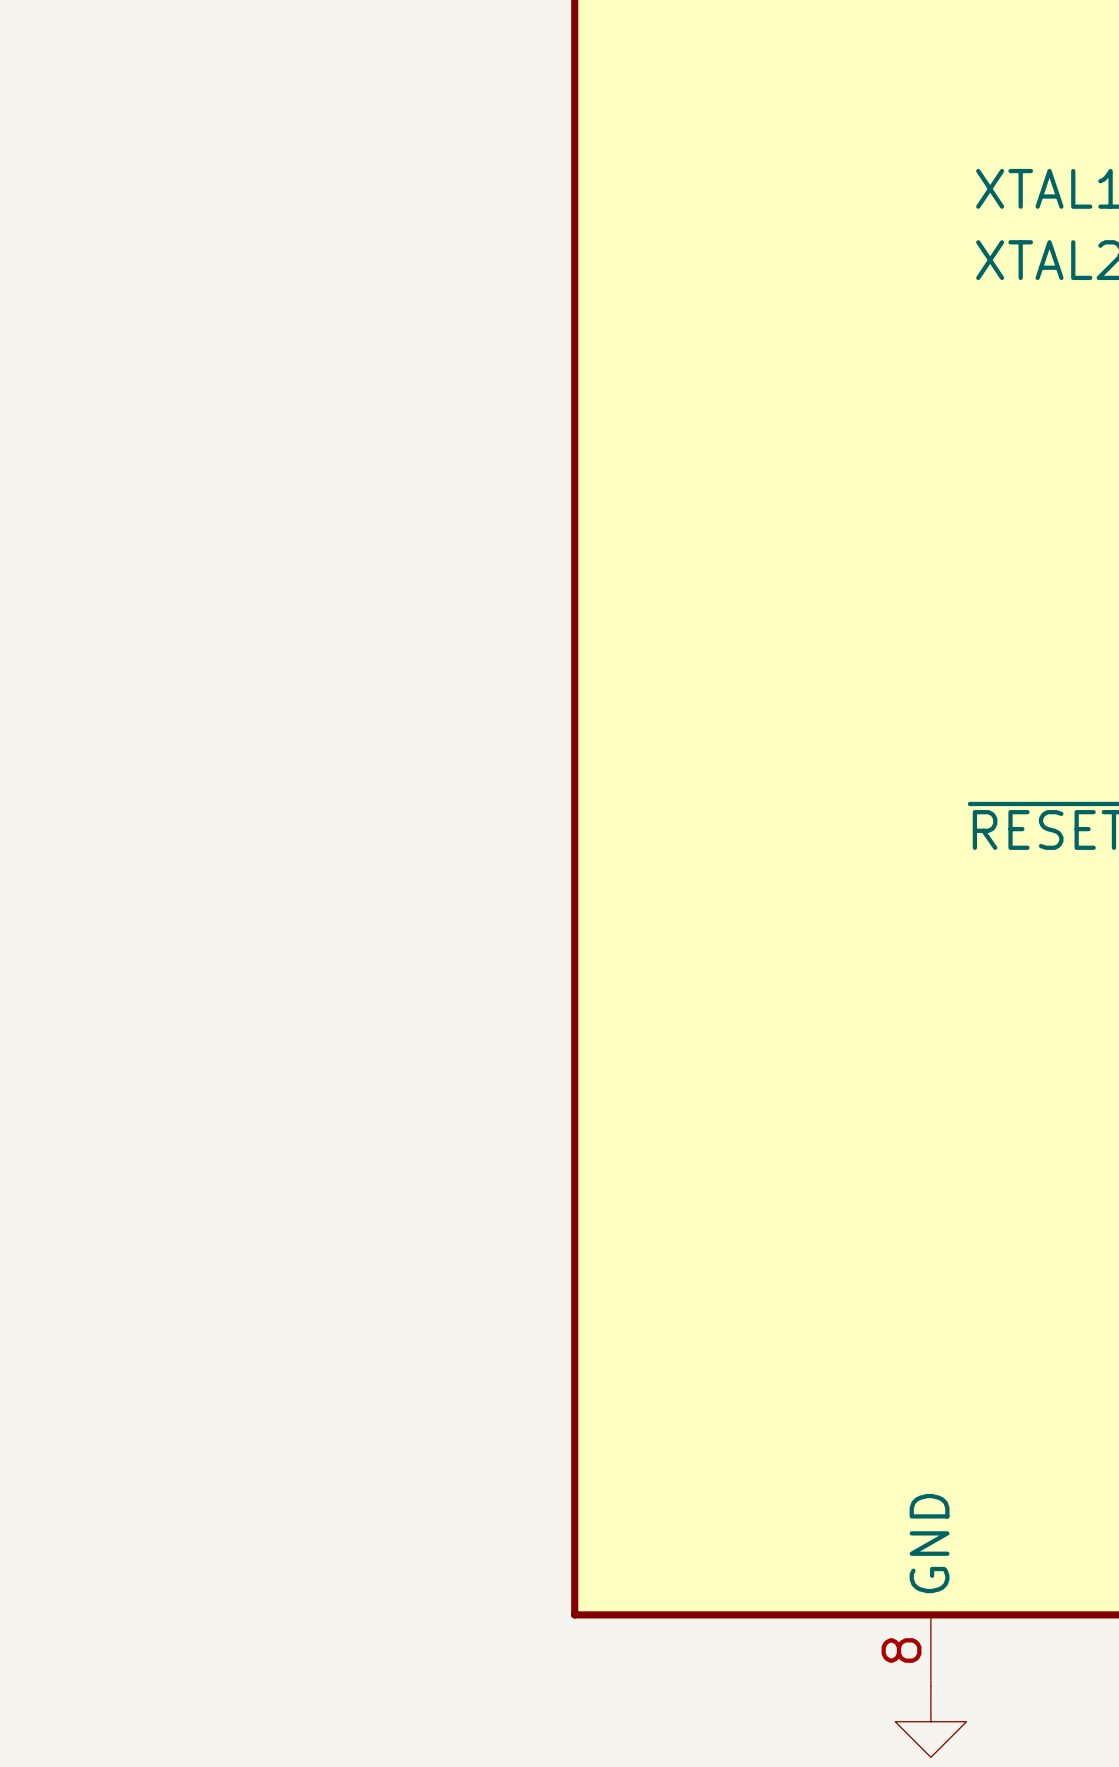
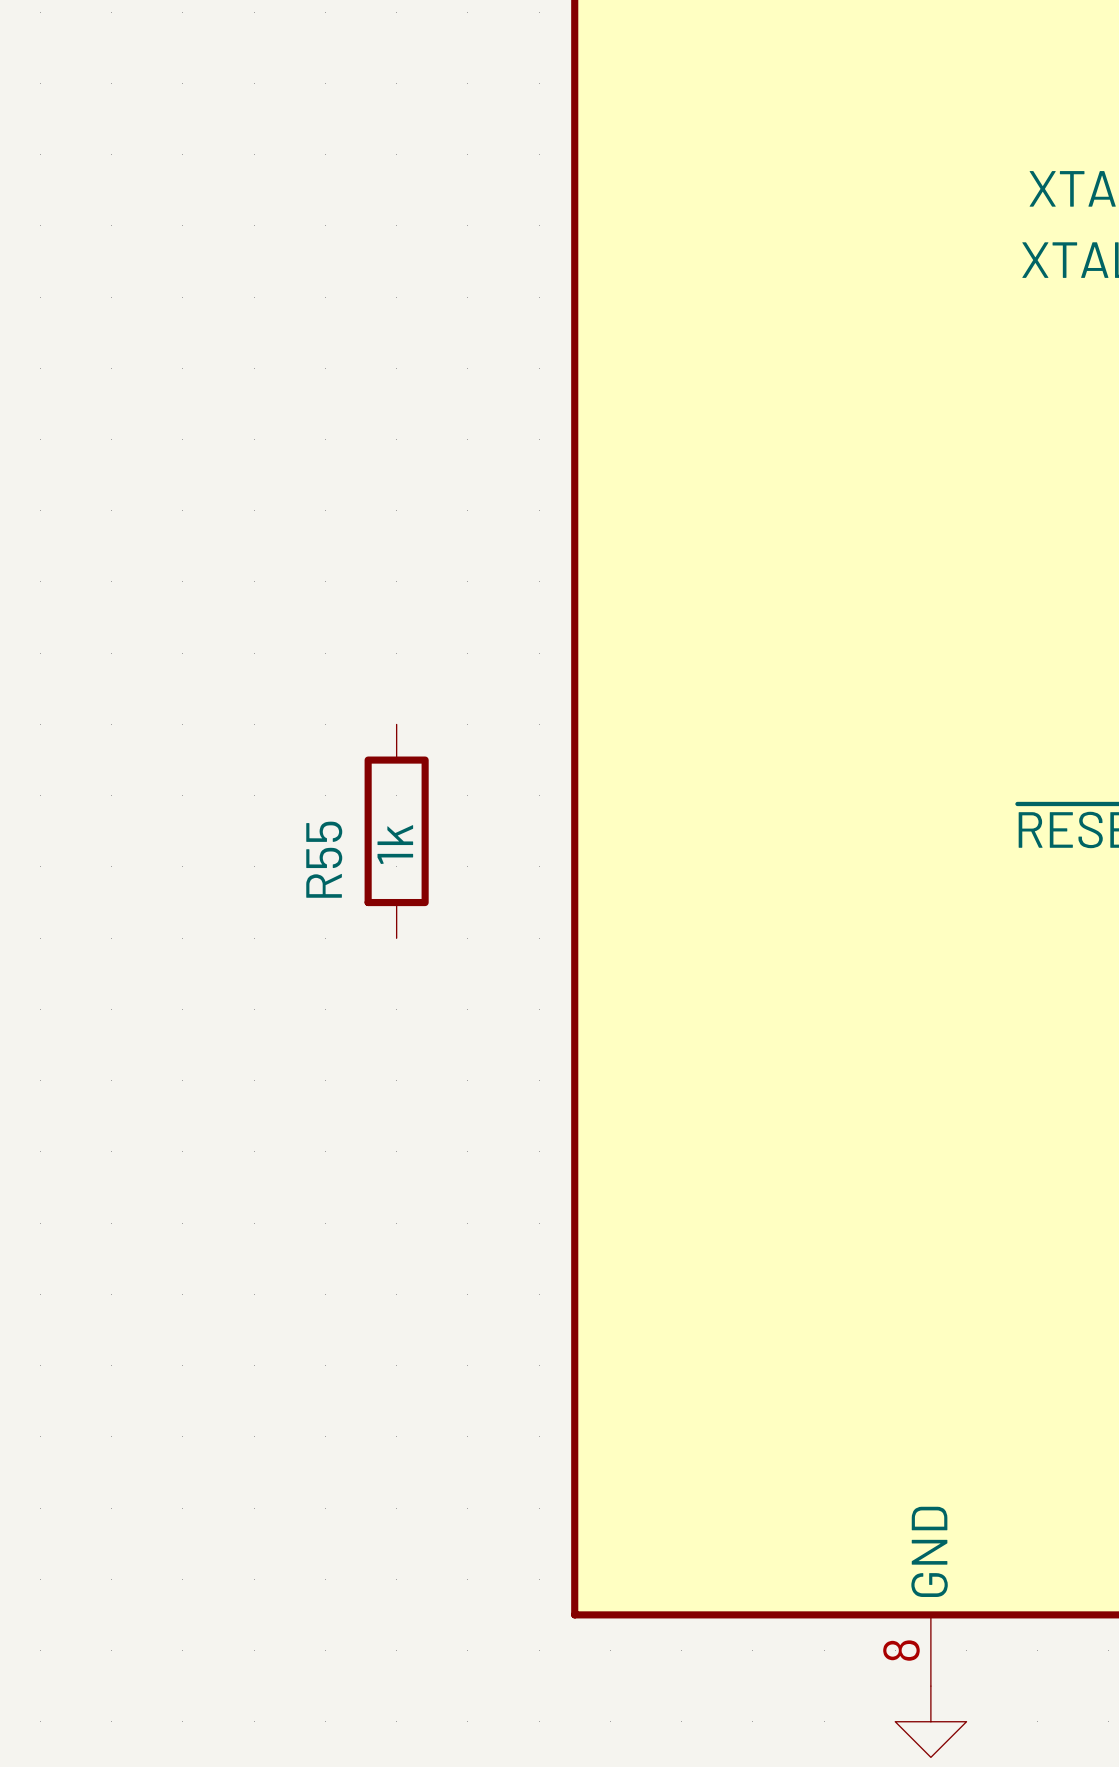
R55: none -> 1k (396, 831)

